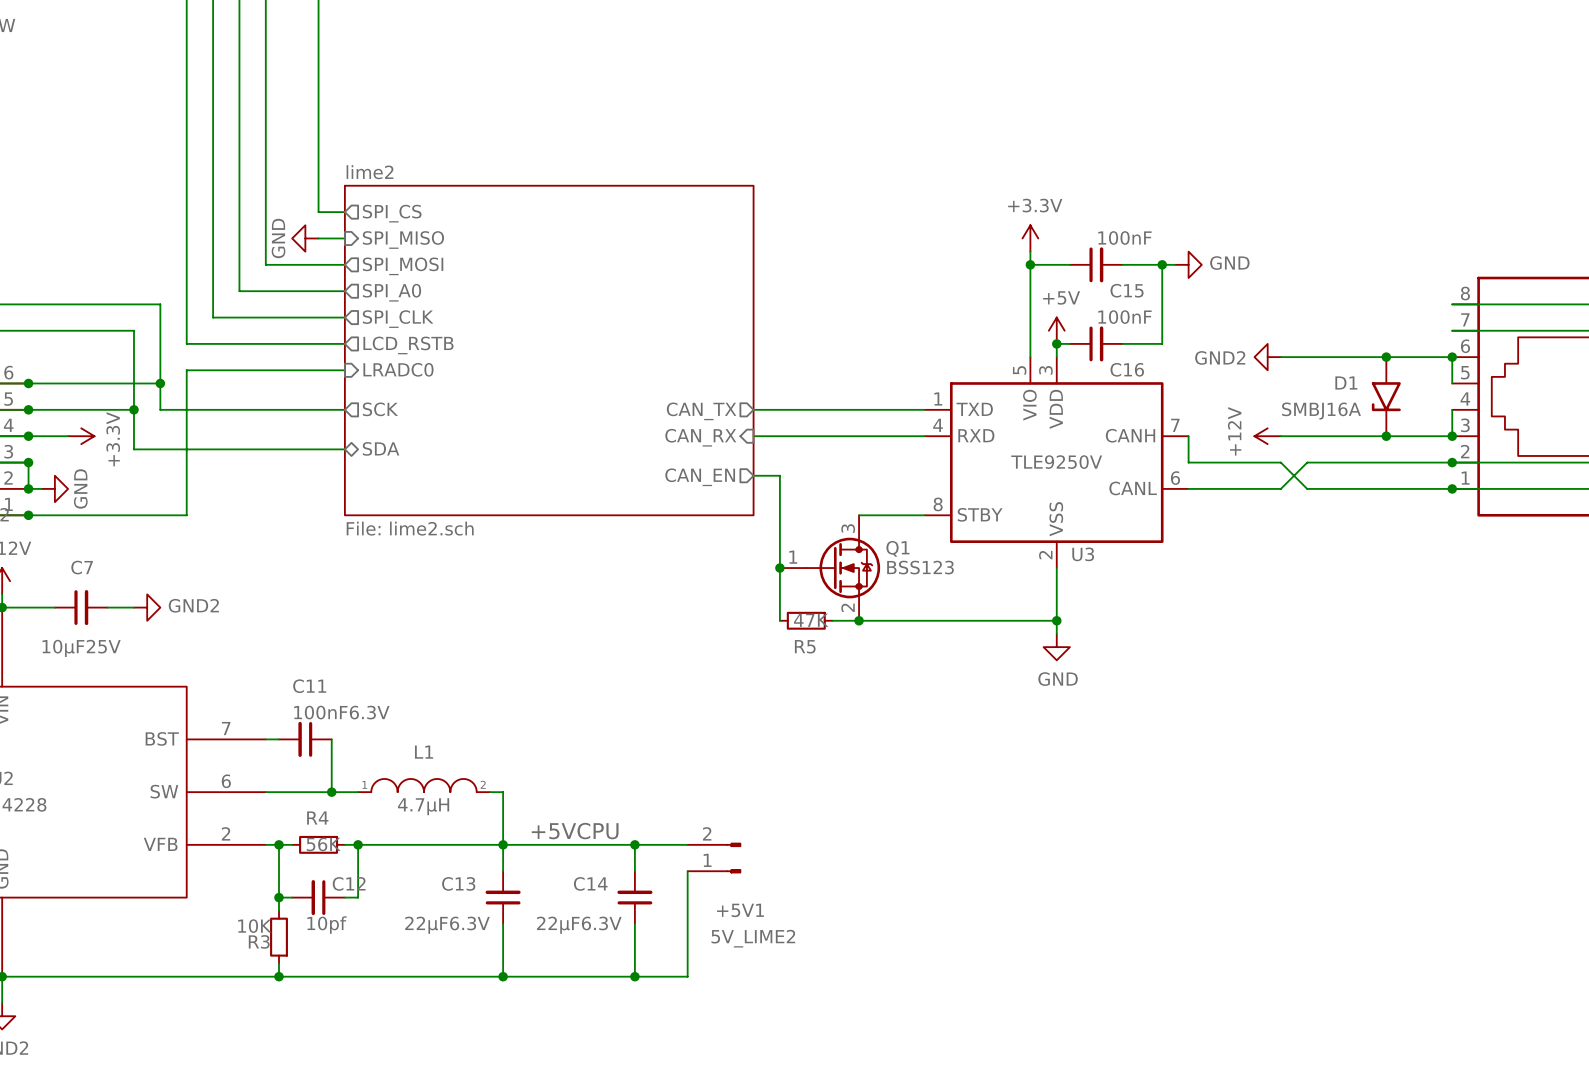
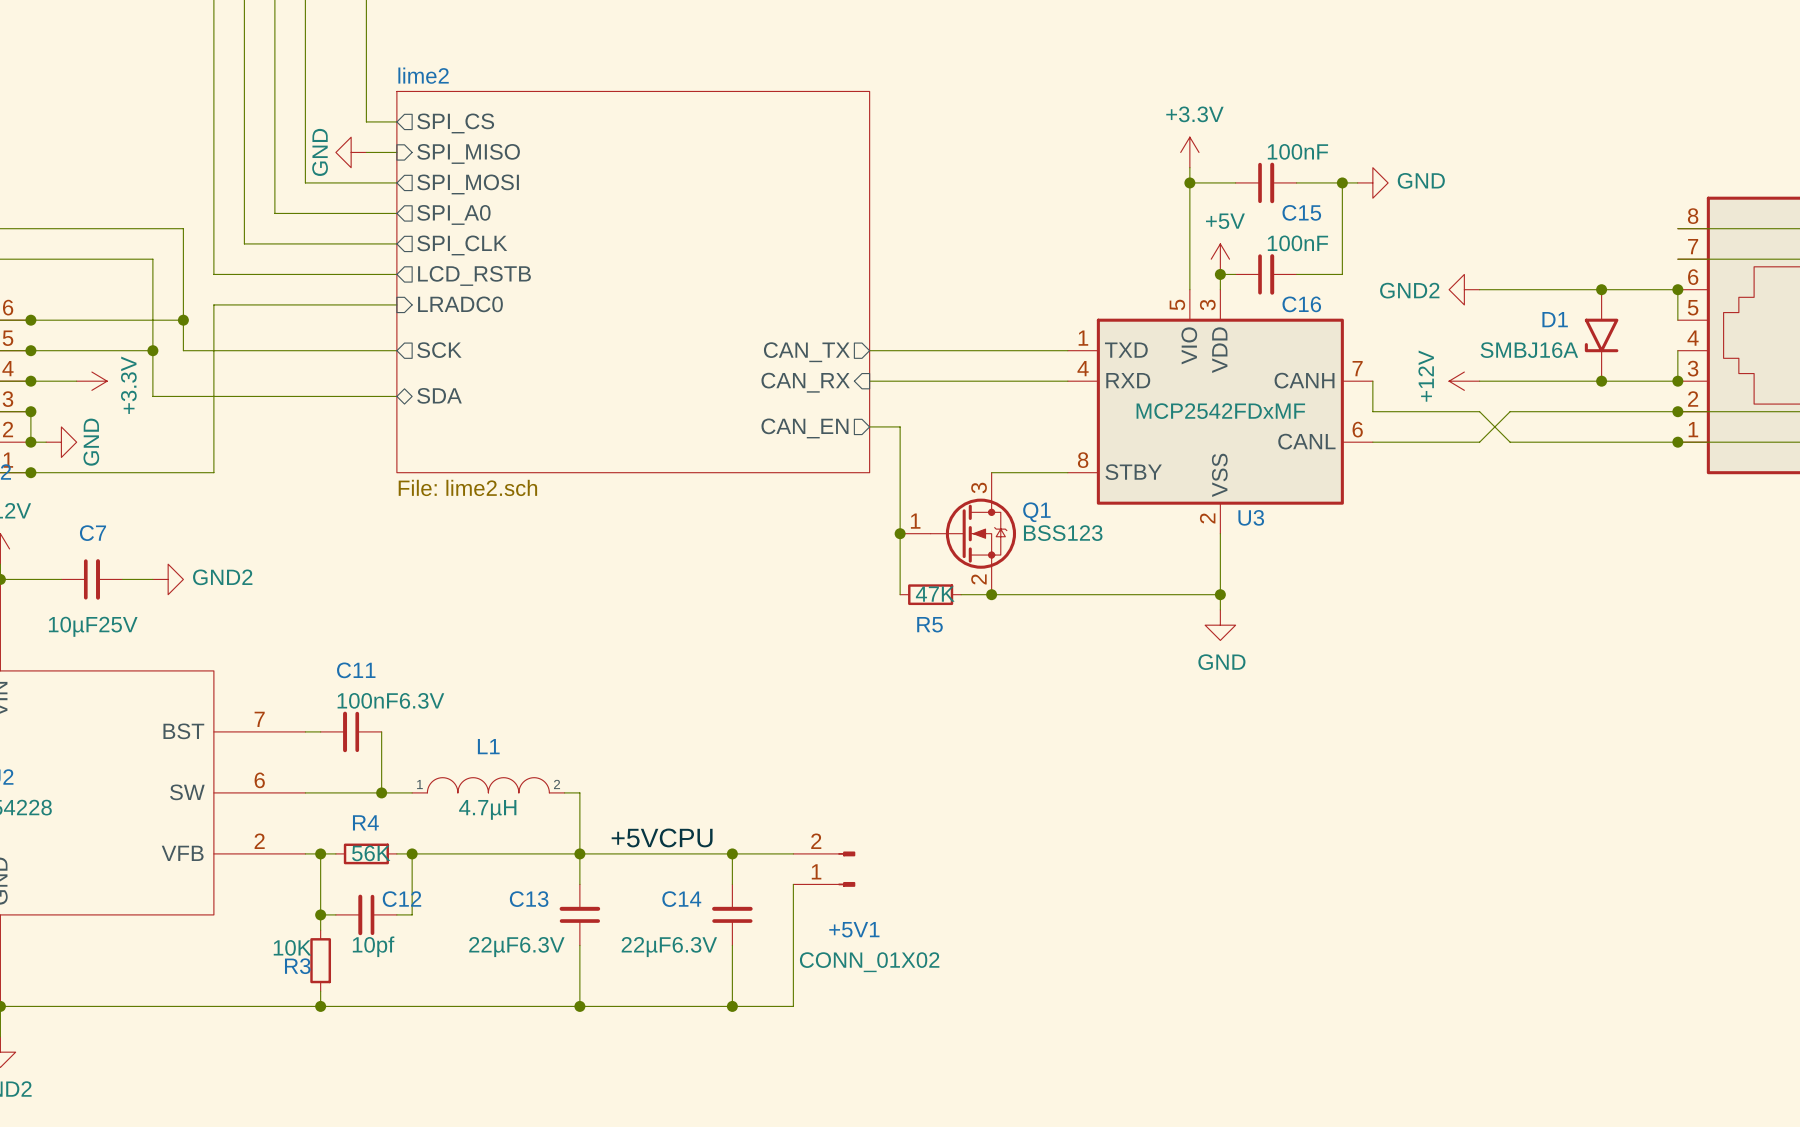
U3 value: TLE9250V (1056, 462) -> MCP2542FDxMF (1220, 411)
+5V1 value: 5V_LIME2 (753, 938) -> CONN_01X02 (869, 962)

